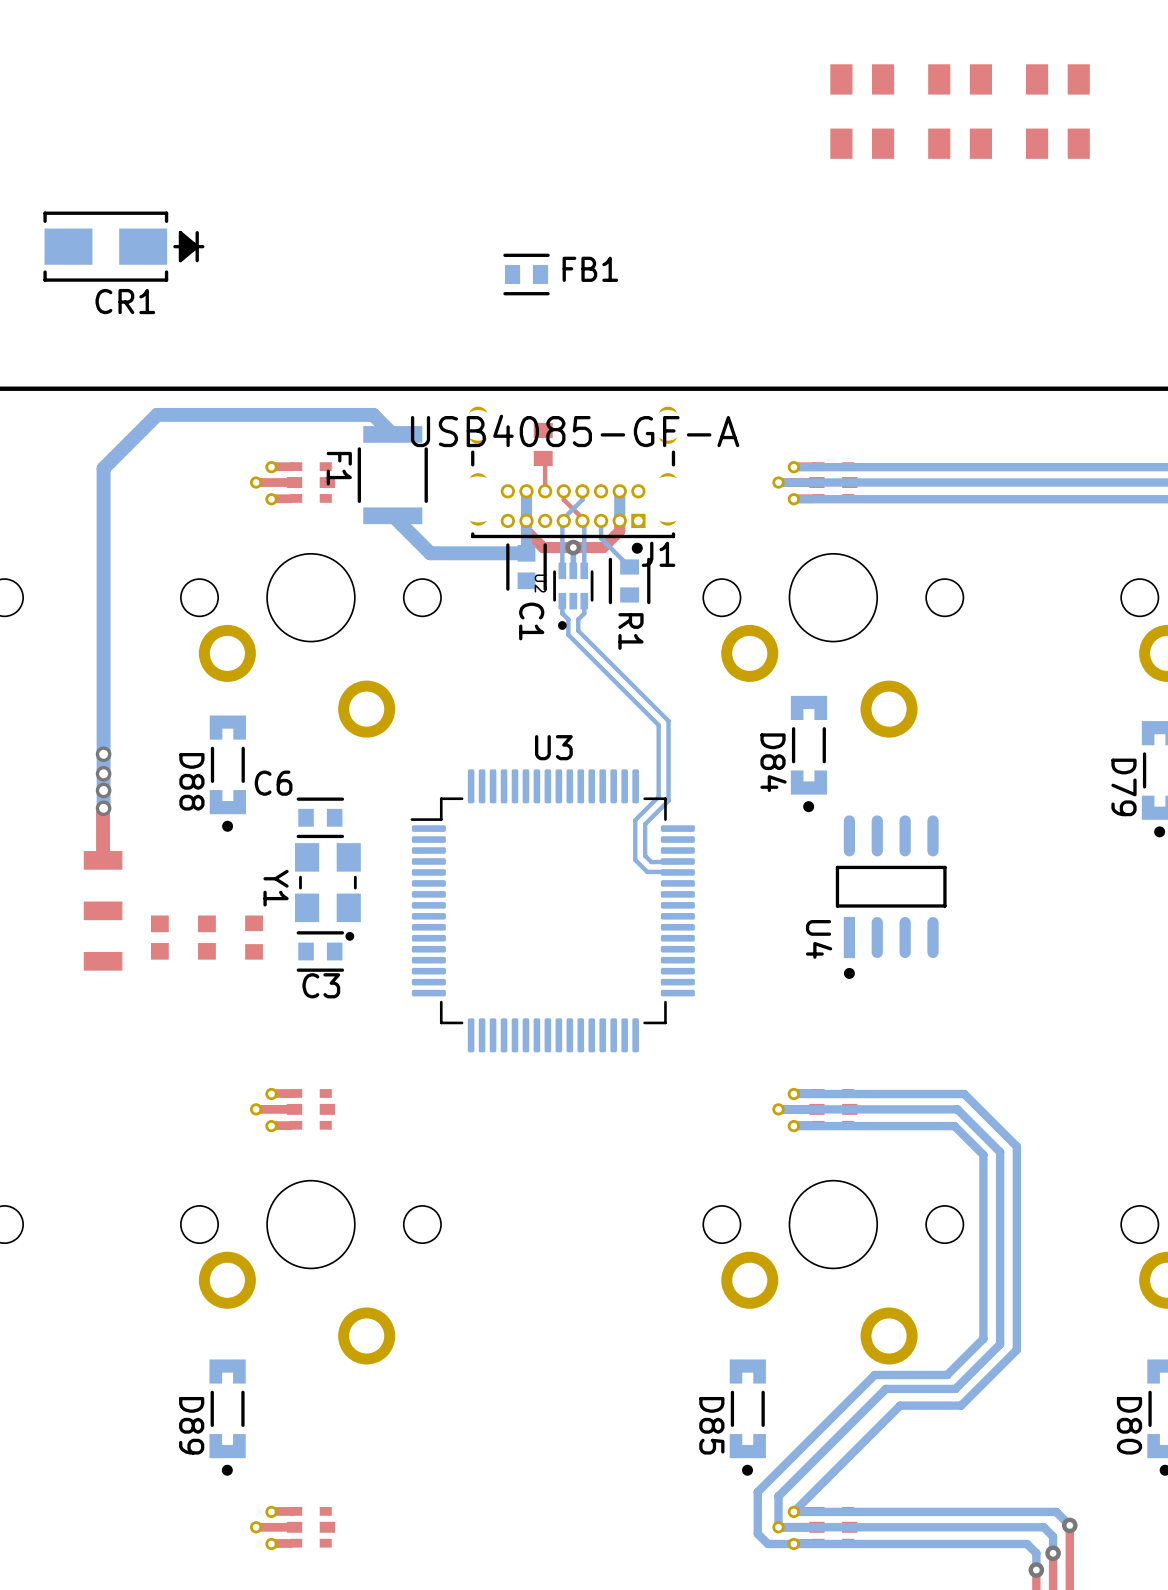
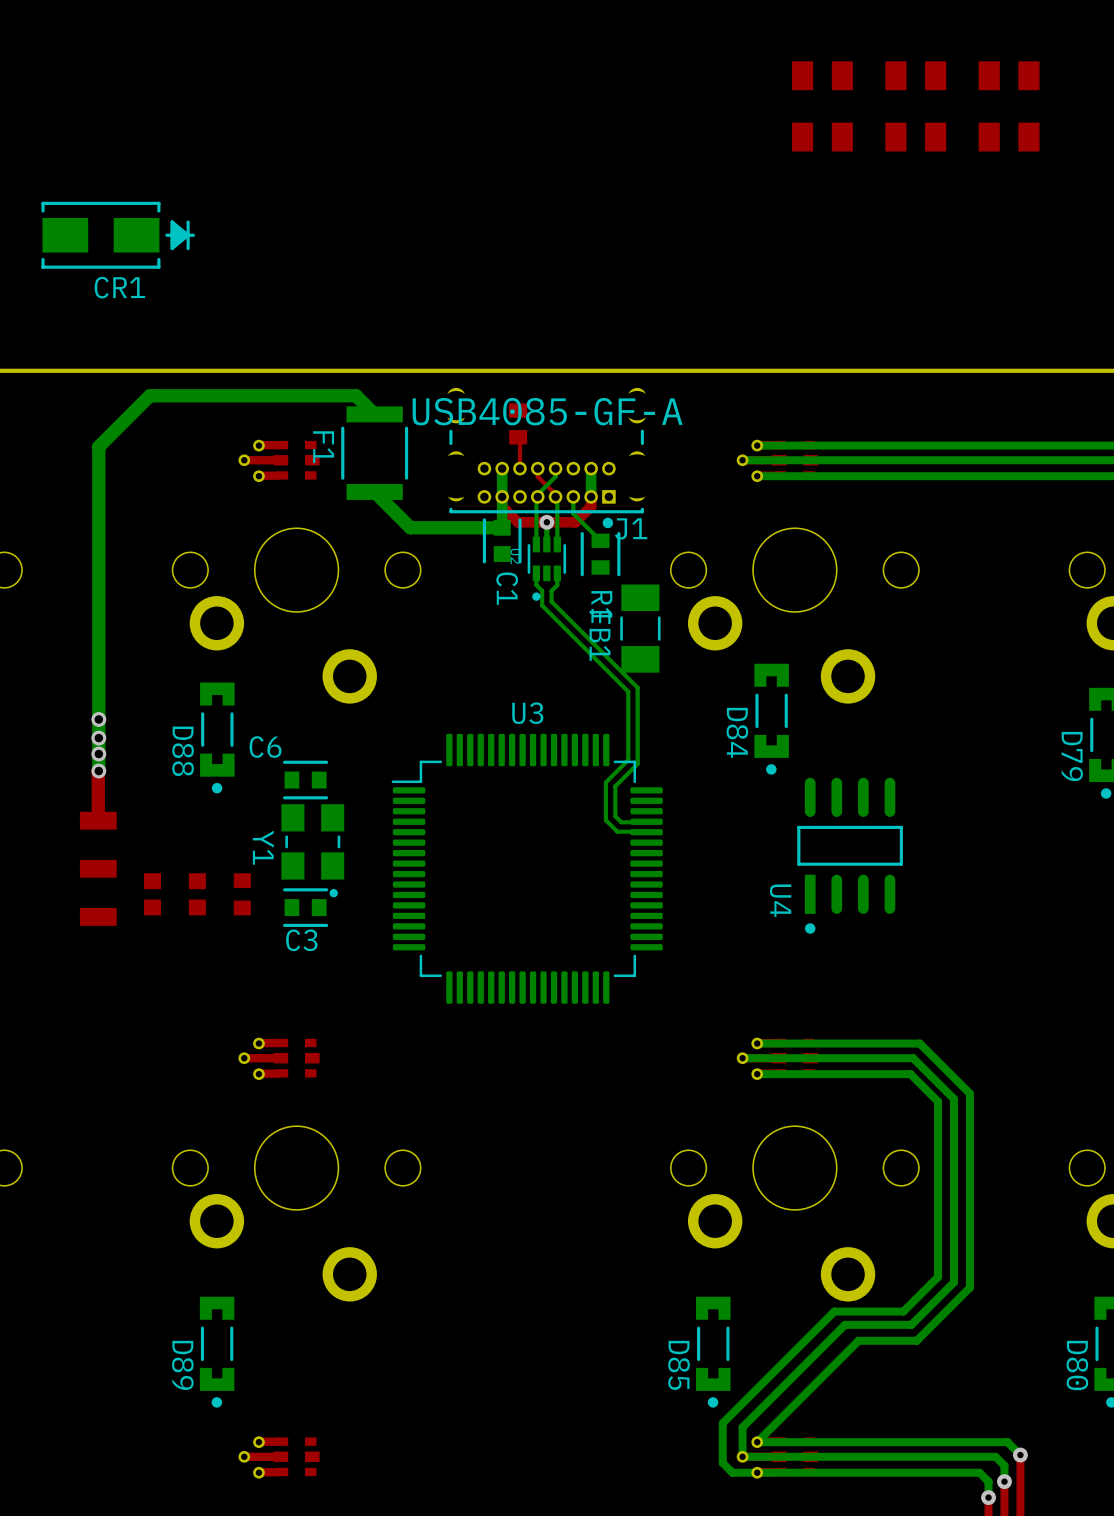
FB1 footprint: [503, 253, 550, 296] -> [620, 584, 661, 673]
FB1 name position: FB1 (590, 269) -> FB1 (600, 635)

